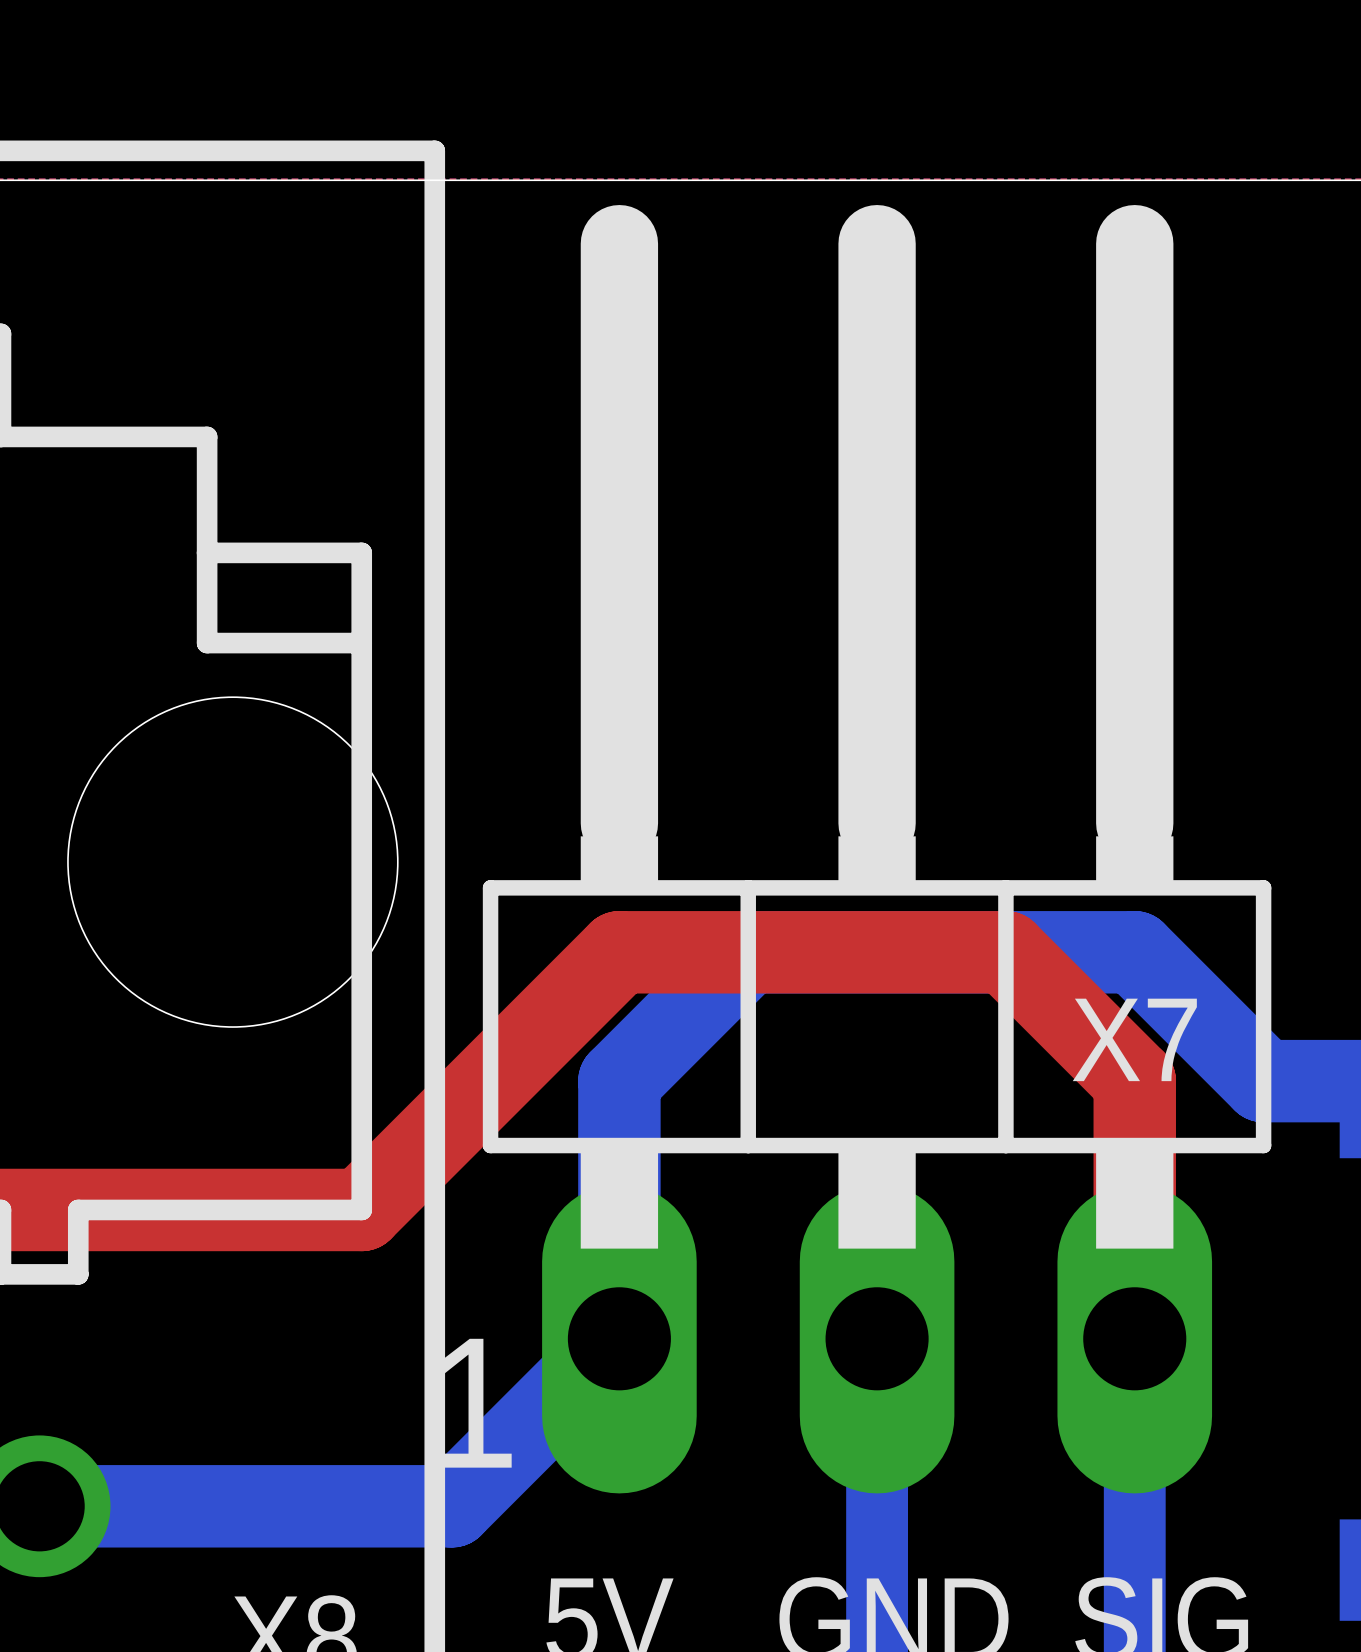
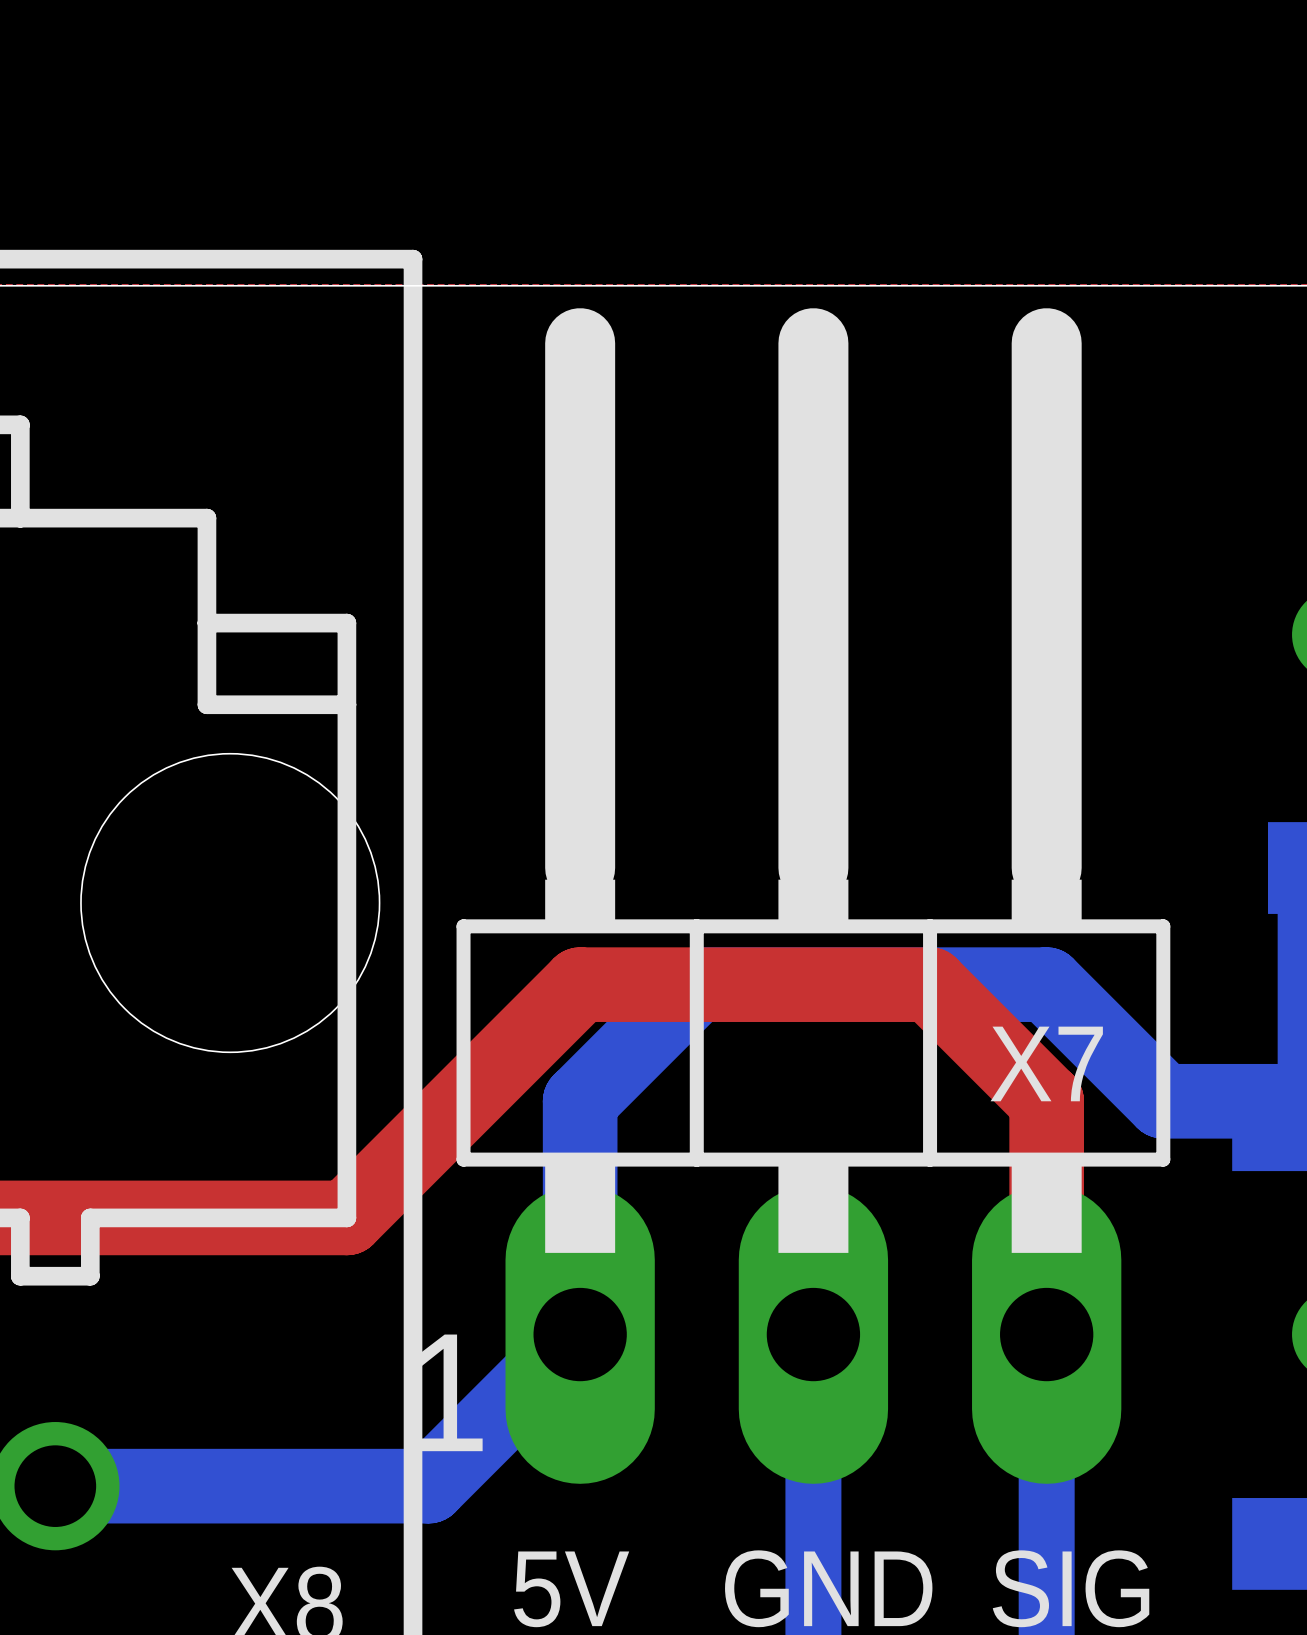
X7 footprint: [482, 205, 1272, 1494] -> [456, 308, 1171, 1484]

